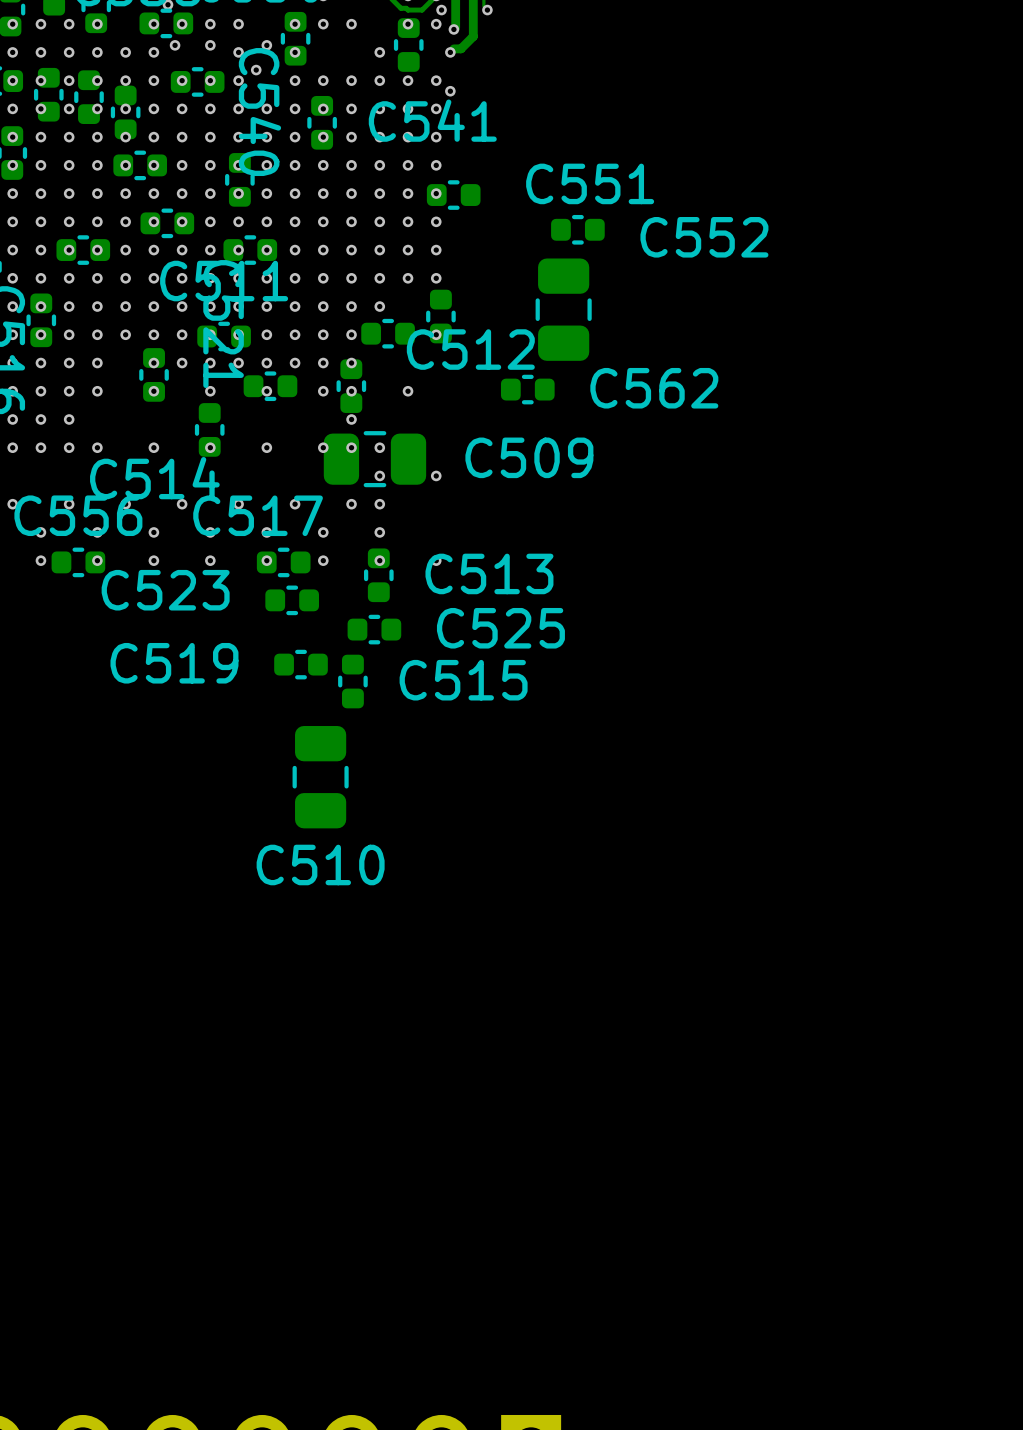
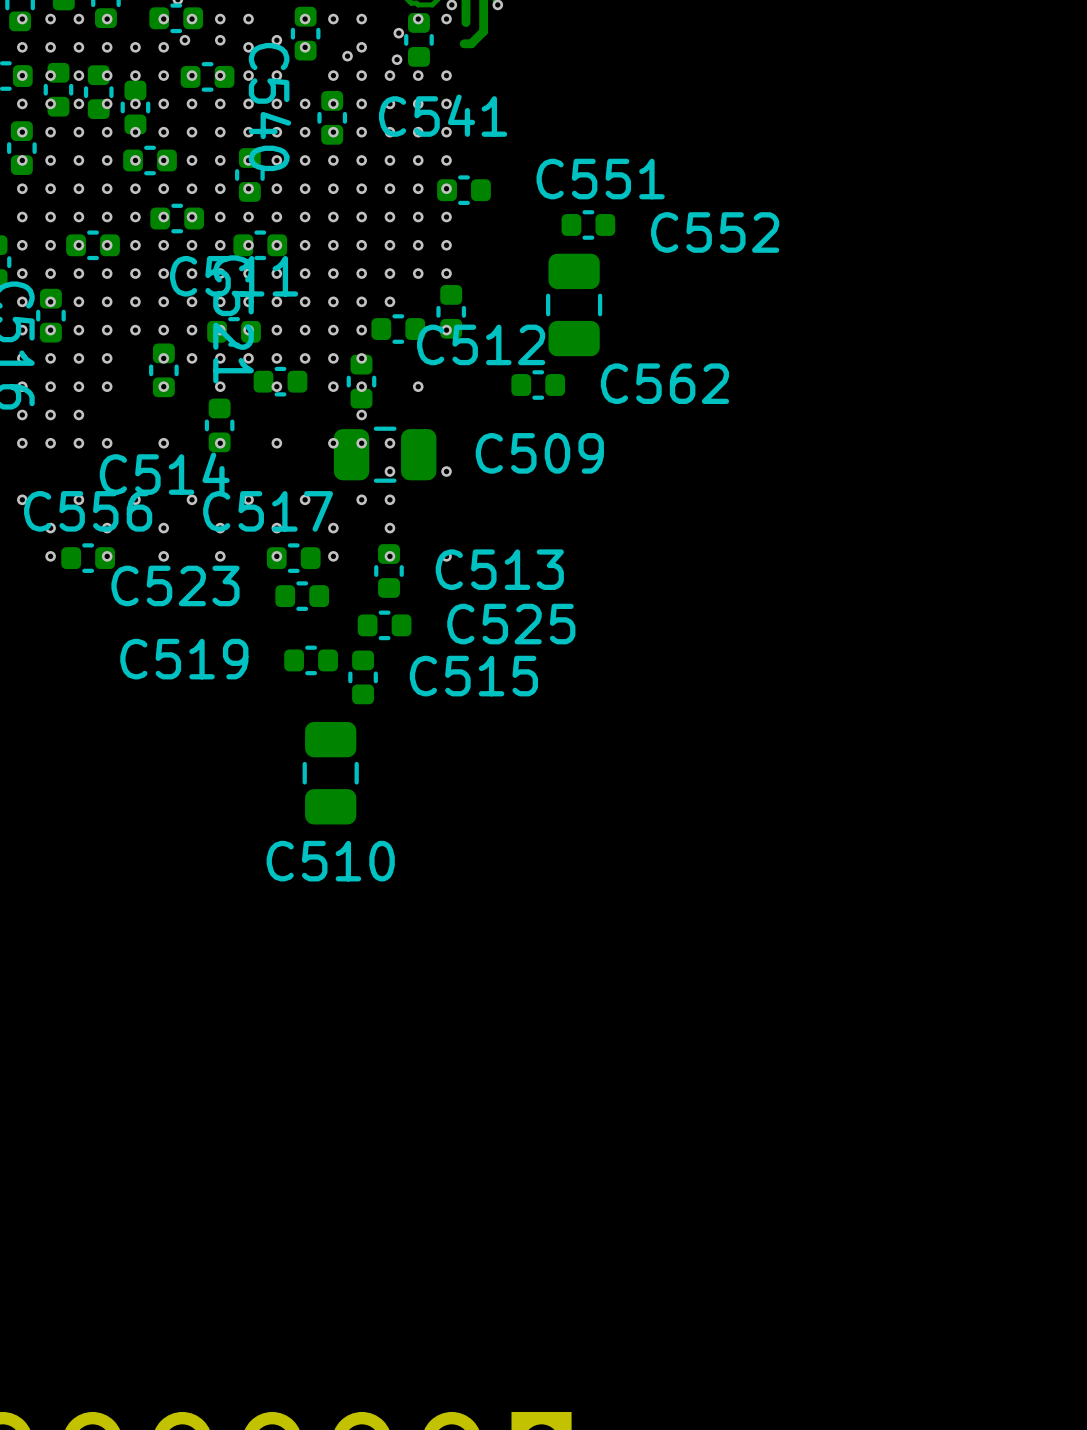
via: (453, 29) -> none
via: none -> (398, 33)
via: none -> (361, 47)
via: (379, 52) -> none
via: (450, 52) -> none
via: none -> (347, 56)
via: none -> (397, 59)
via position: (256, 70) -> (276, 75)
via: (295, 80) -> none
via: (450, 91) -> none

